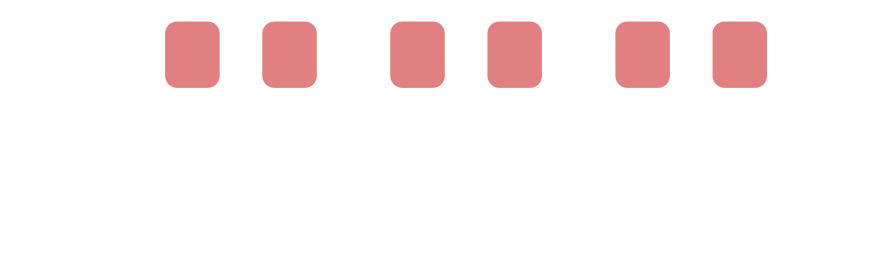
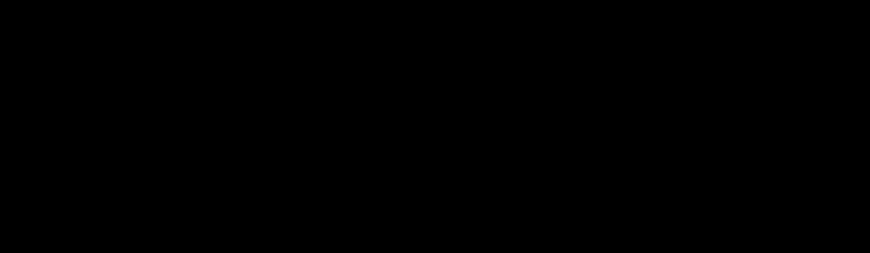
part: (240, 54) -> none
part: (466, 54) -> none
part: (691, 54) -> none

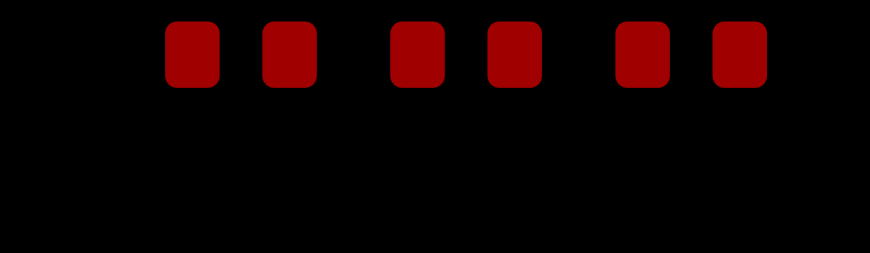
part: none -> (240, 54)
part: none -> (466, 54)
part: none -> (691, 54)

